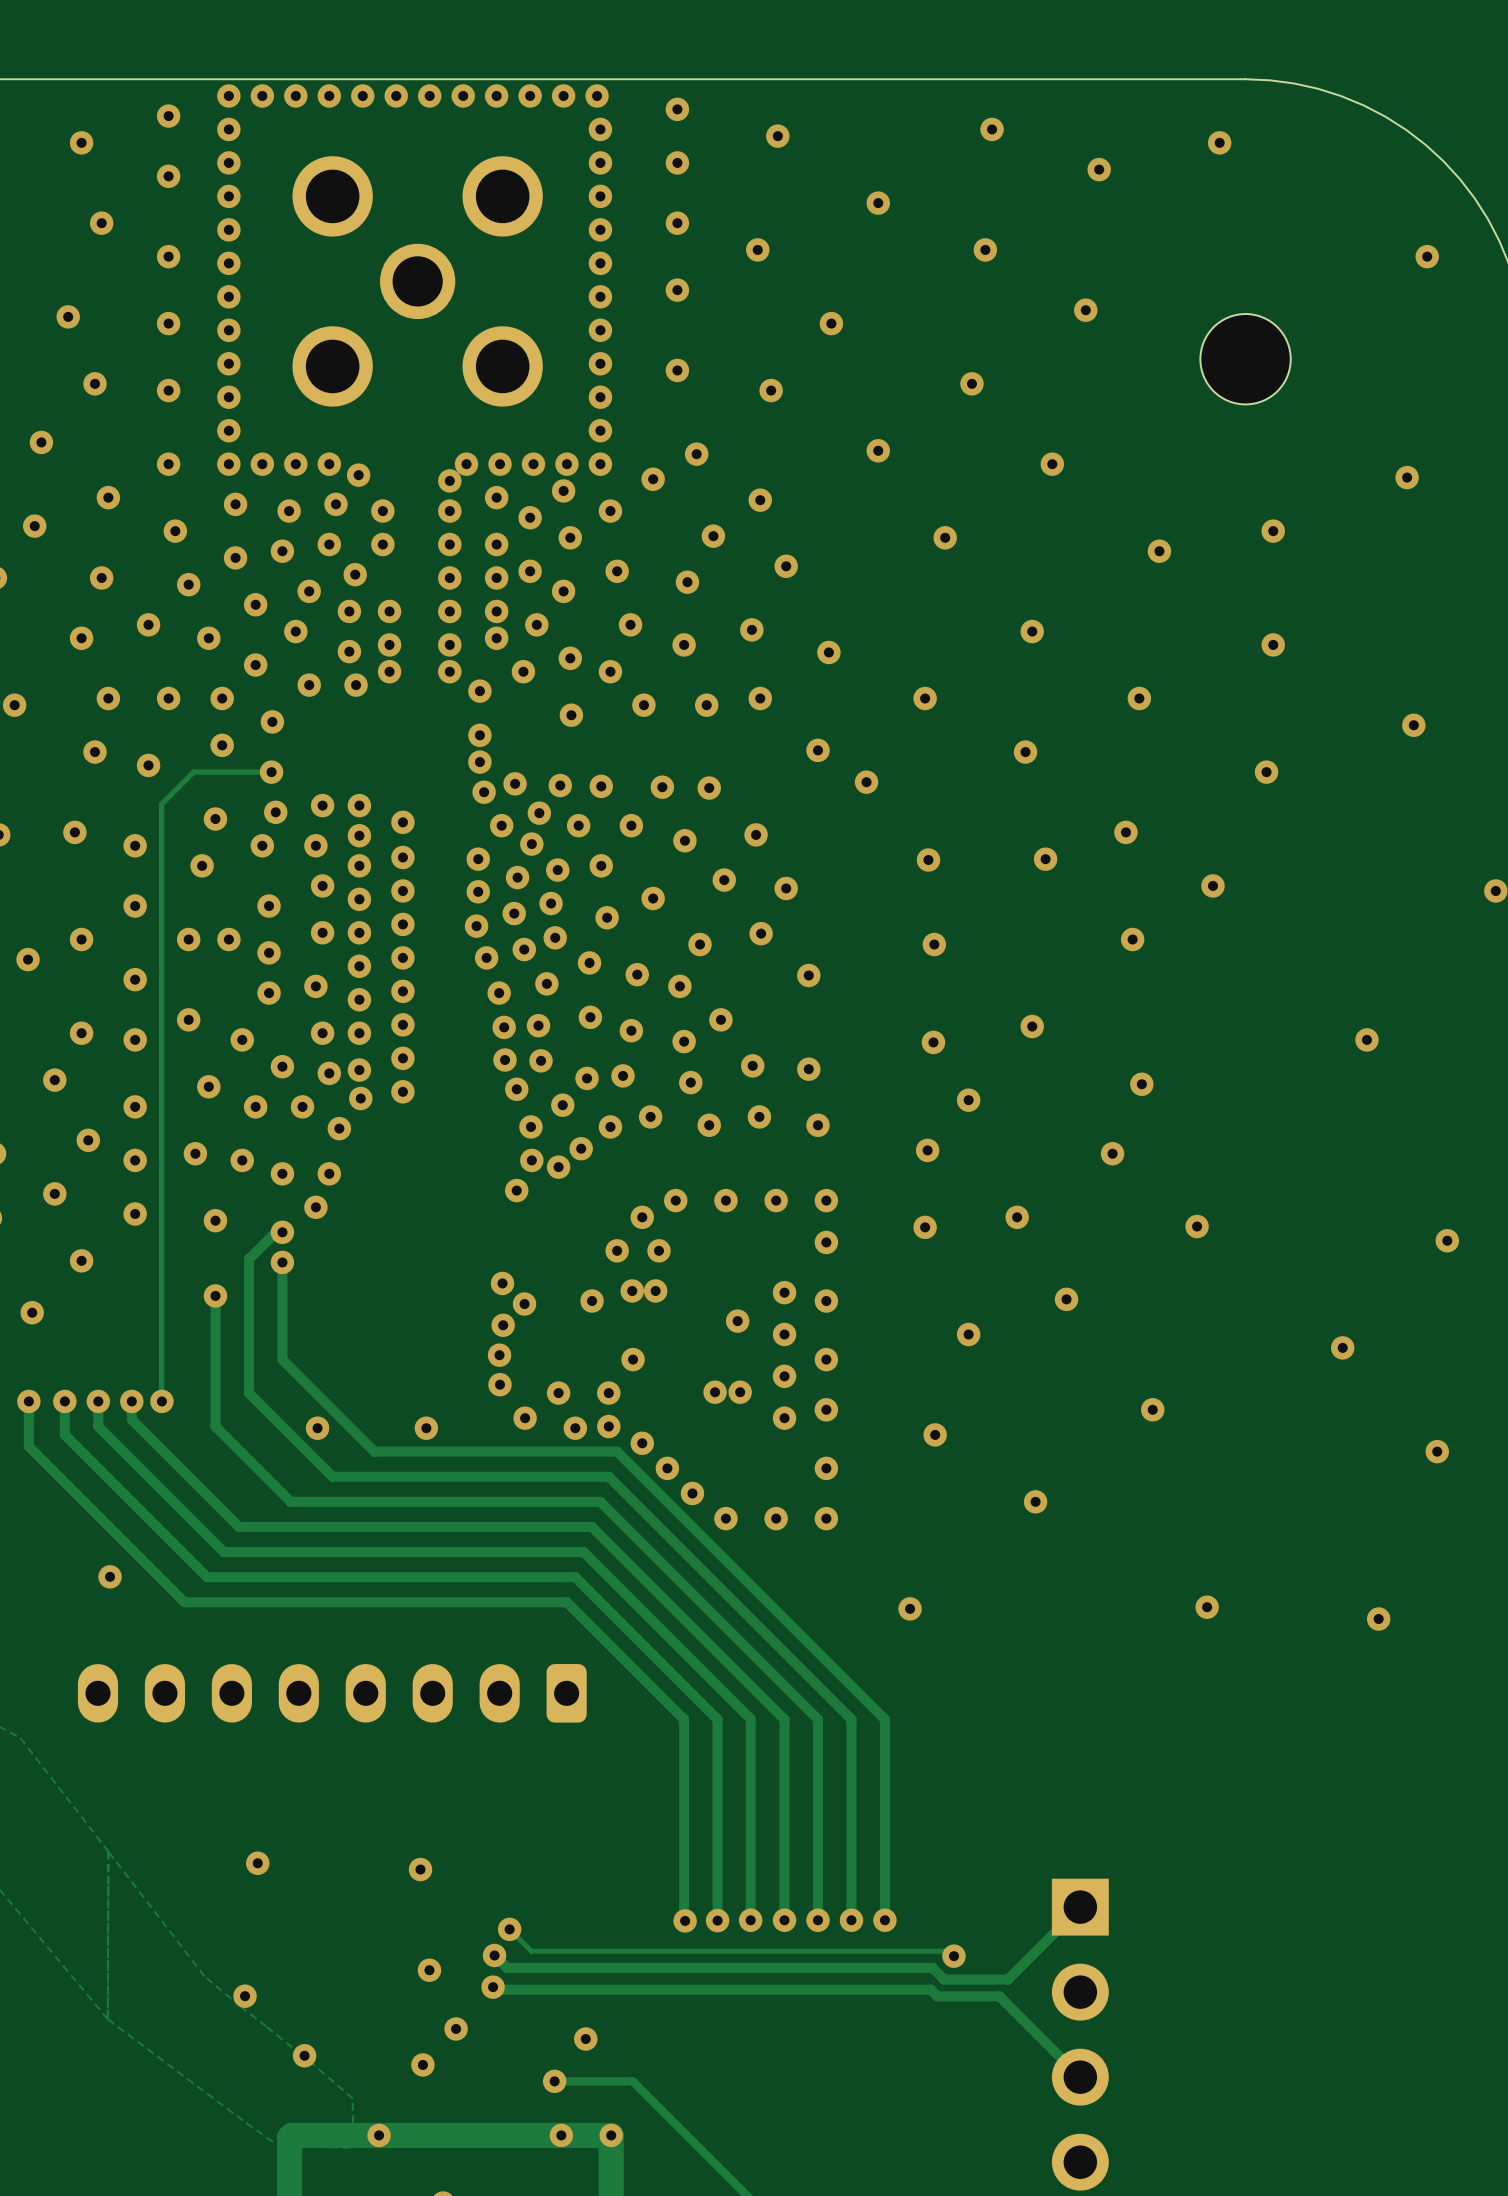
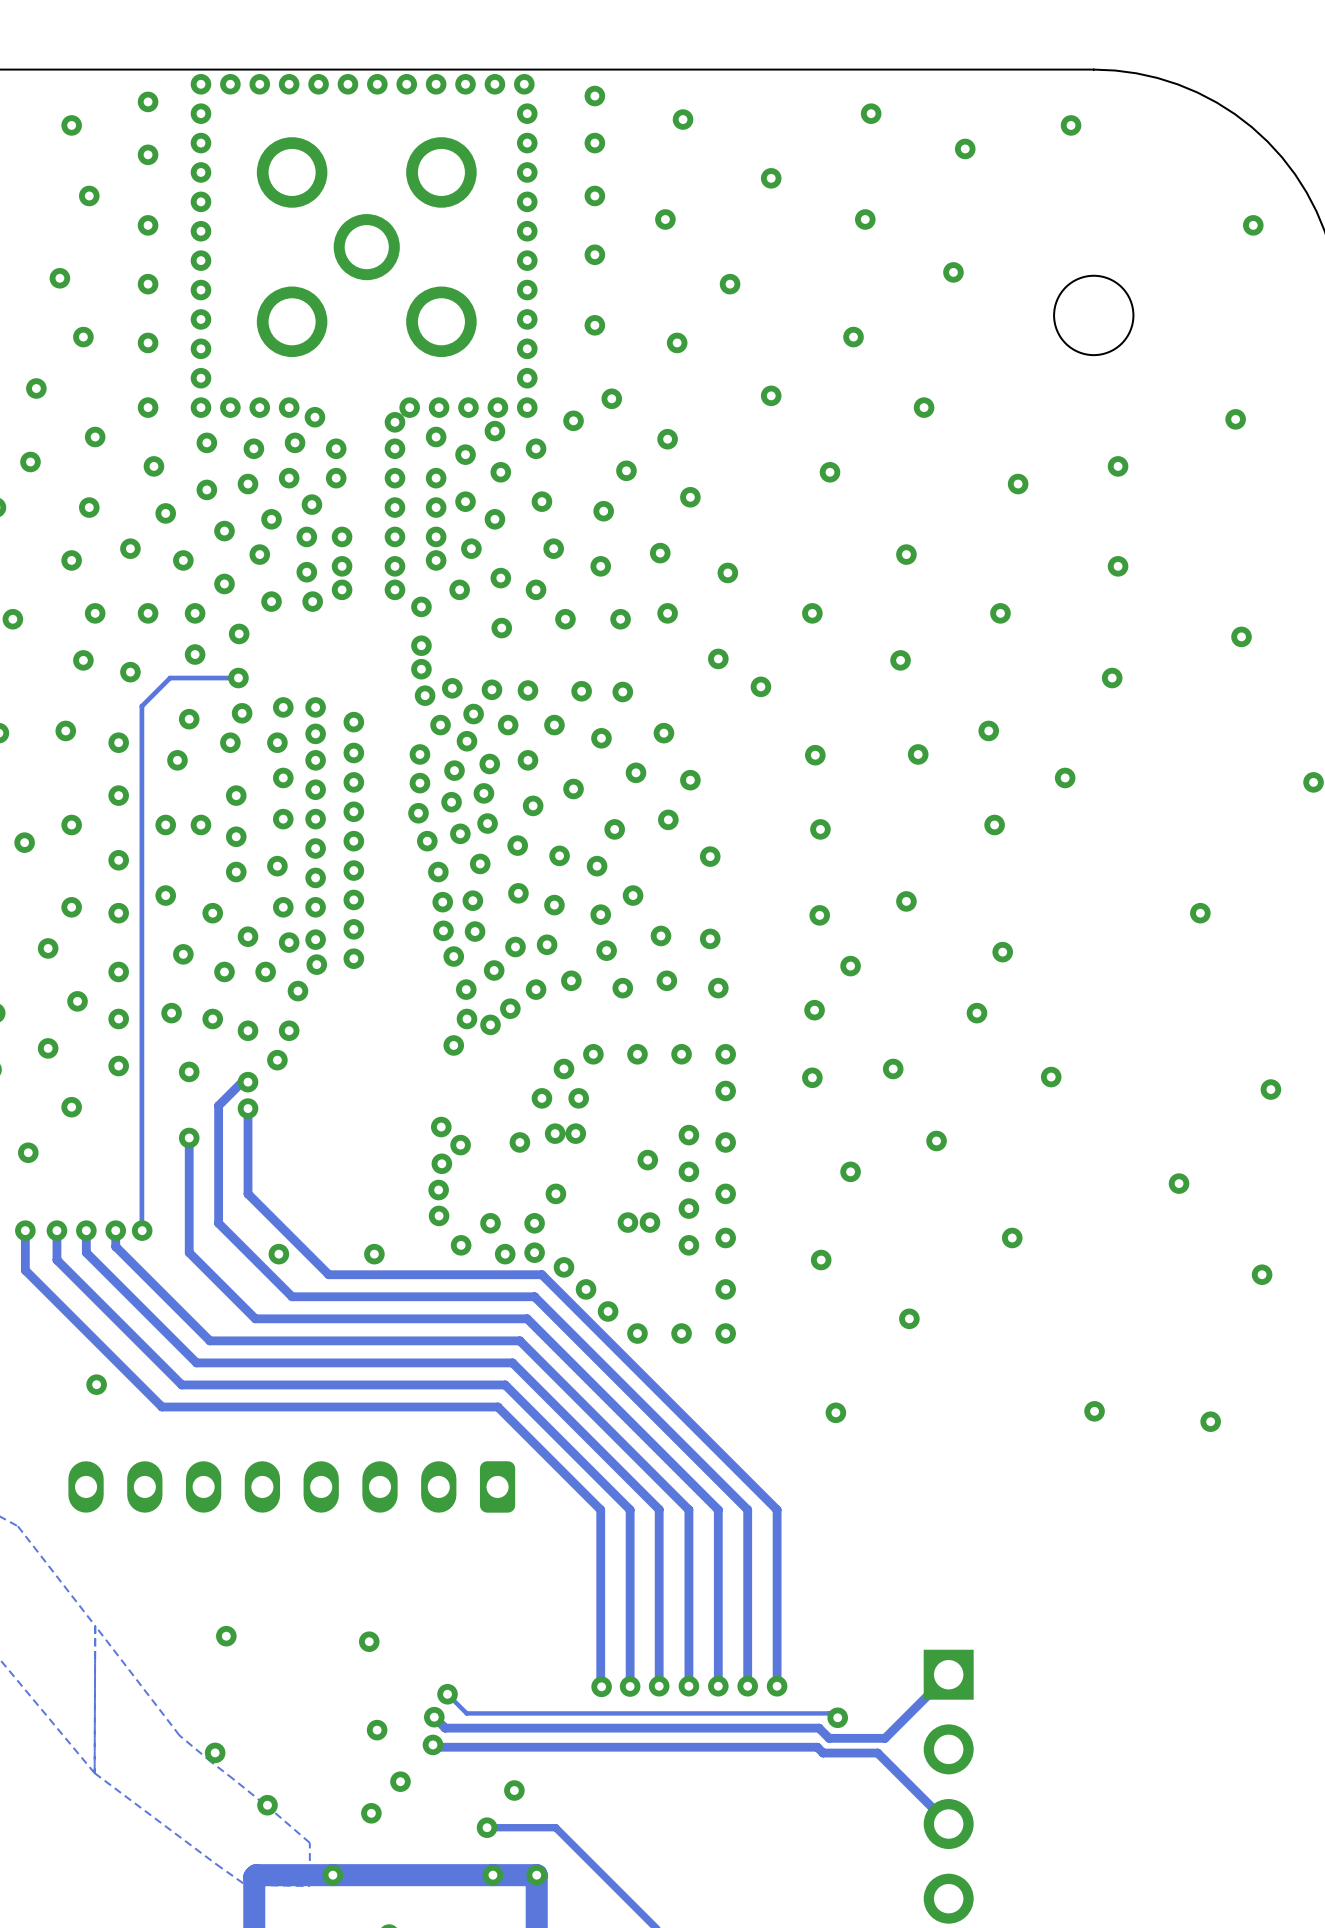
via position: (1207, 1607) -> (1094, 1411)
via position: (910, 1608) -> (835, 1412)

